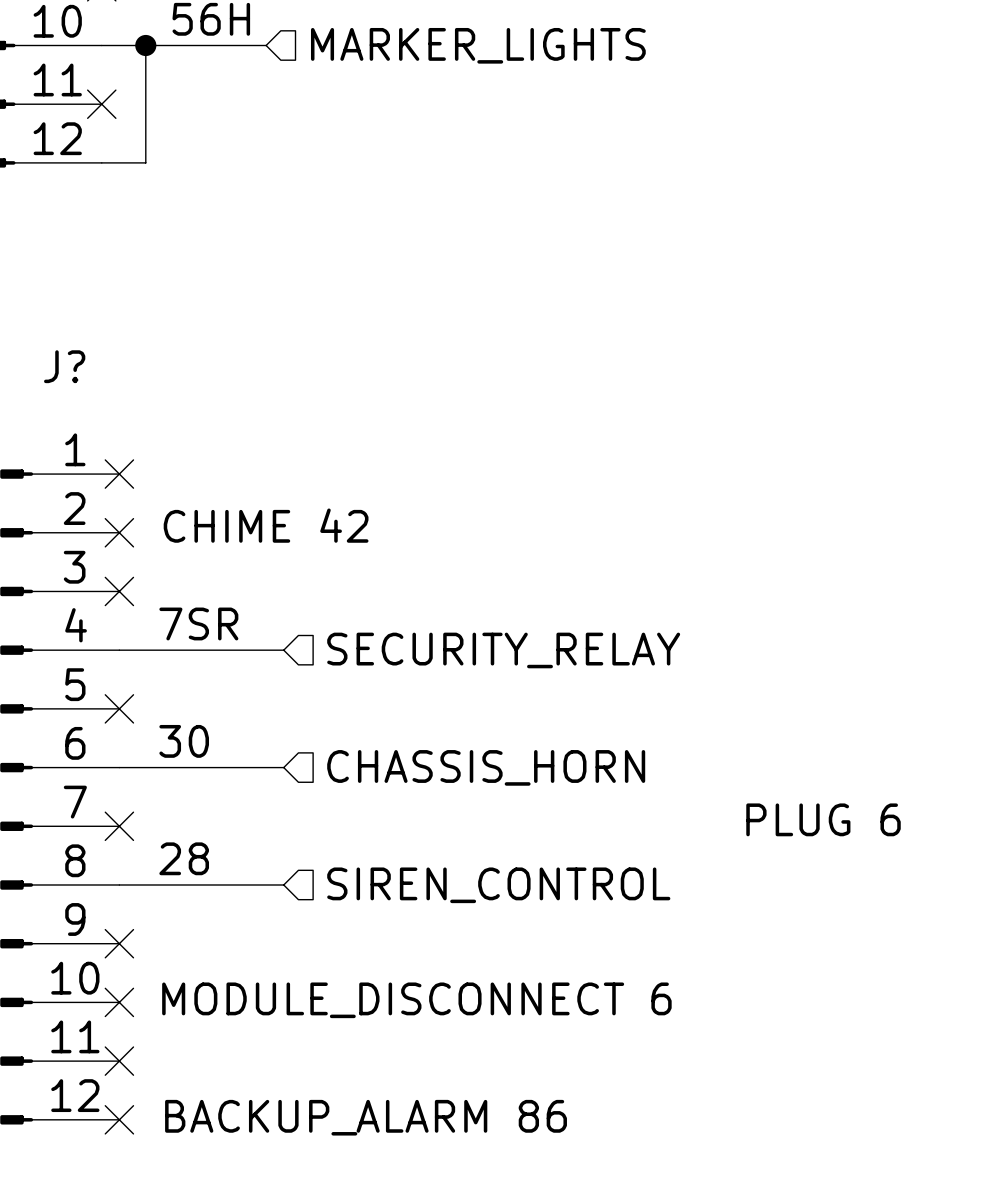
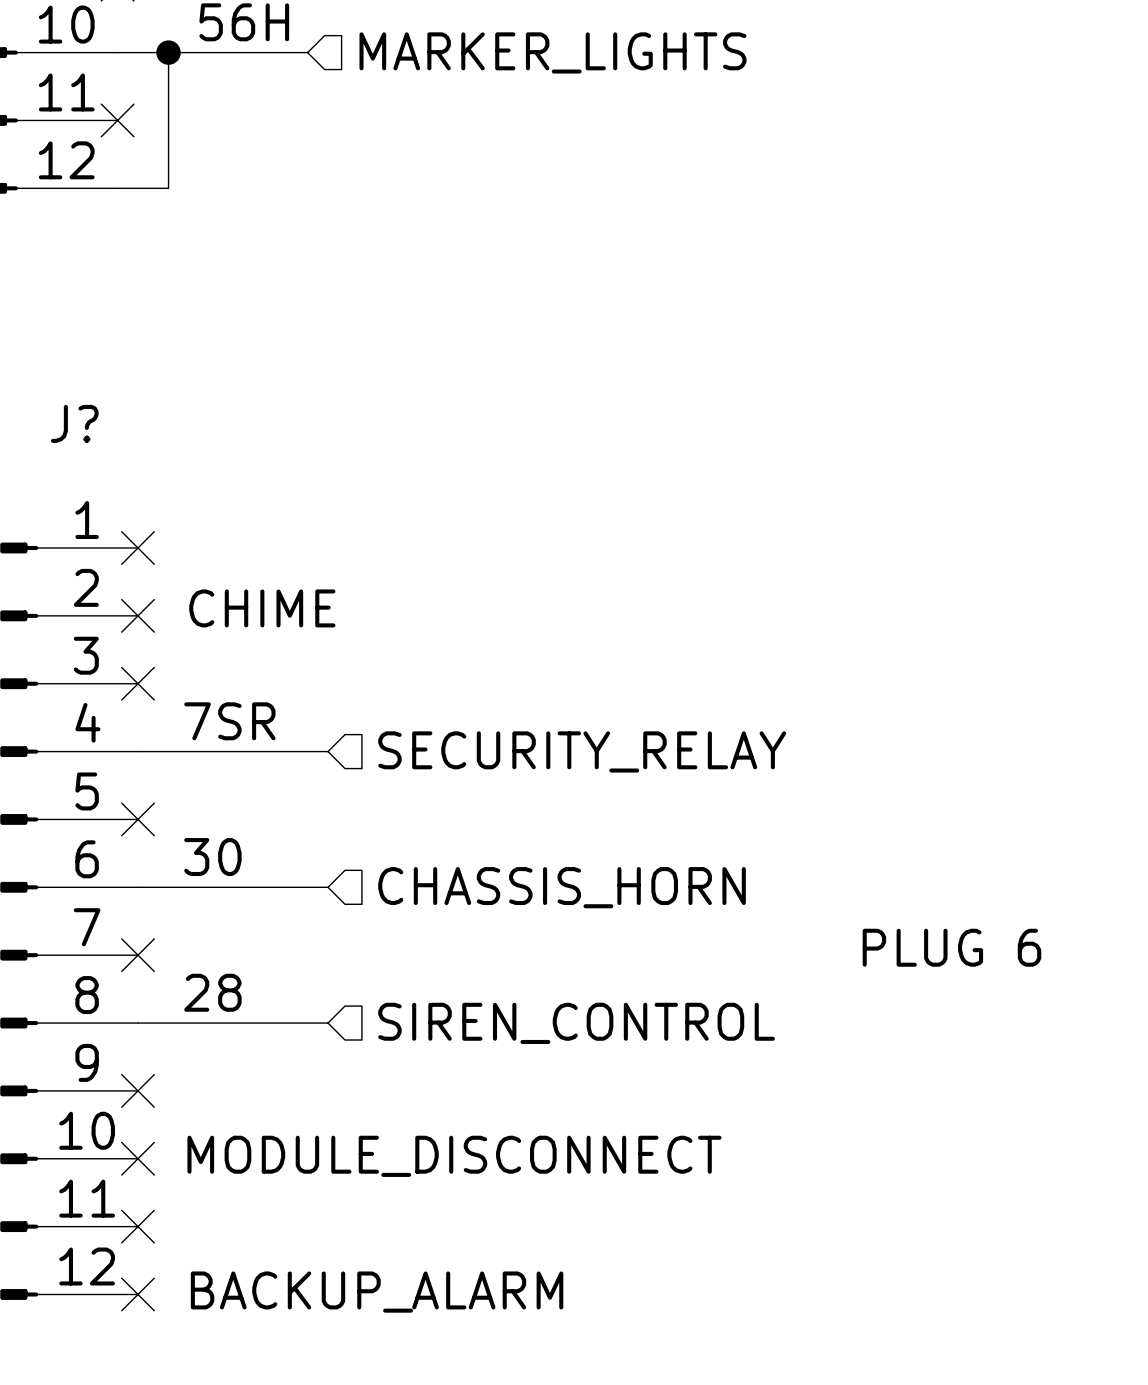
text: CHIME 42 (266, 525) -> CHIME (262, 608)
text: MODULE_DISCONNECT 6 (416, 1000) -> MODULE_DISCONNECT (454, 1156)
text: BACKUP_ALARM 86 (366, 1117) -> BACKUP_ALARM (377, 1292)

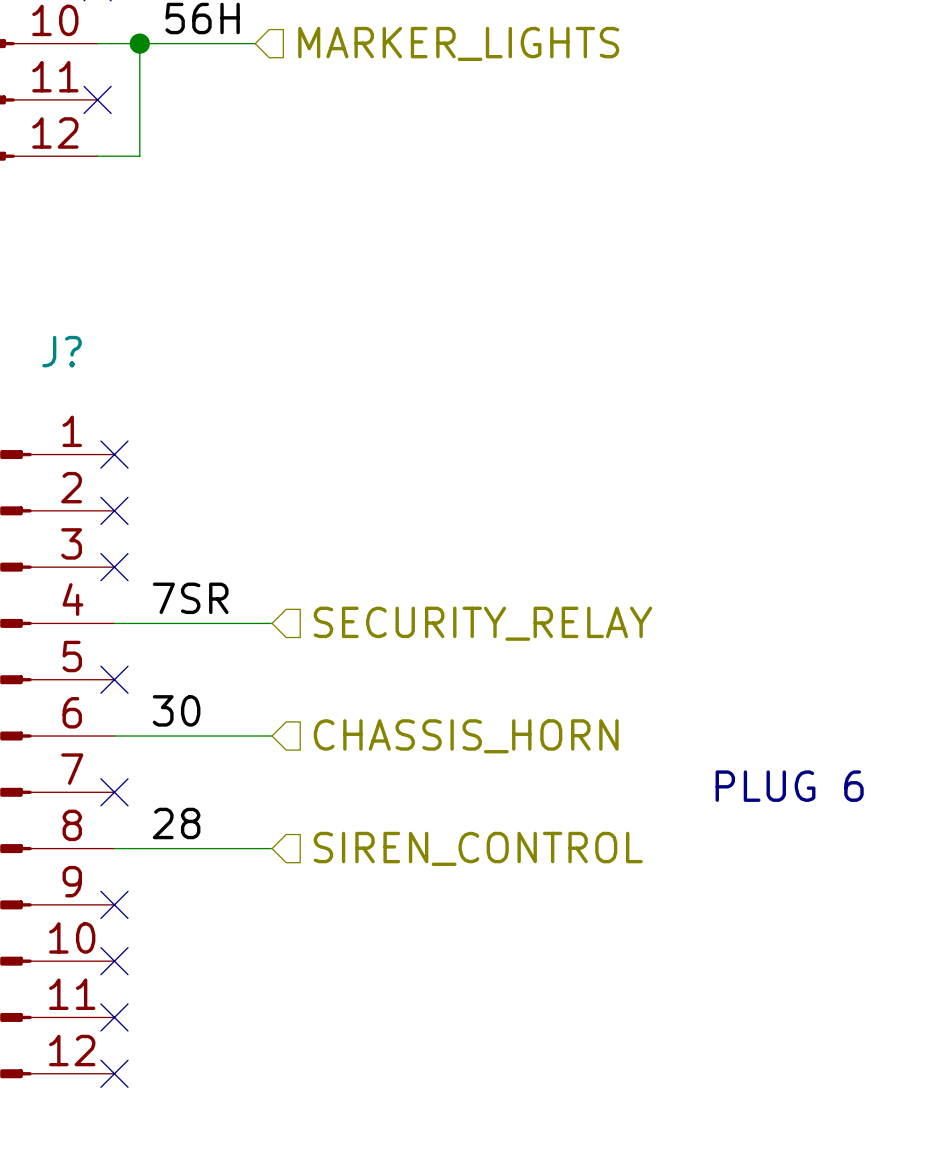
text: CHIME (262, 608) -> none
text: MODULE_DISCONNECT (454, 1156) -> none
text: BACKUP_ALARM (377, 1292) -> none

